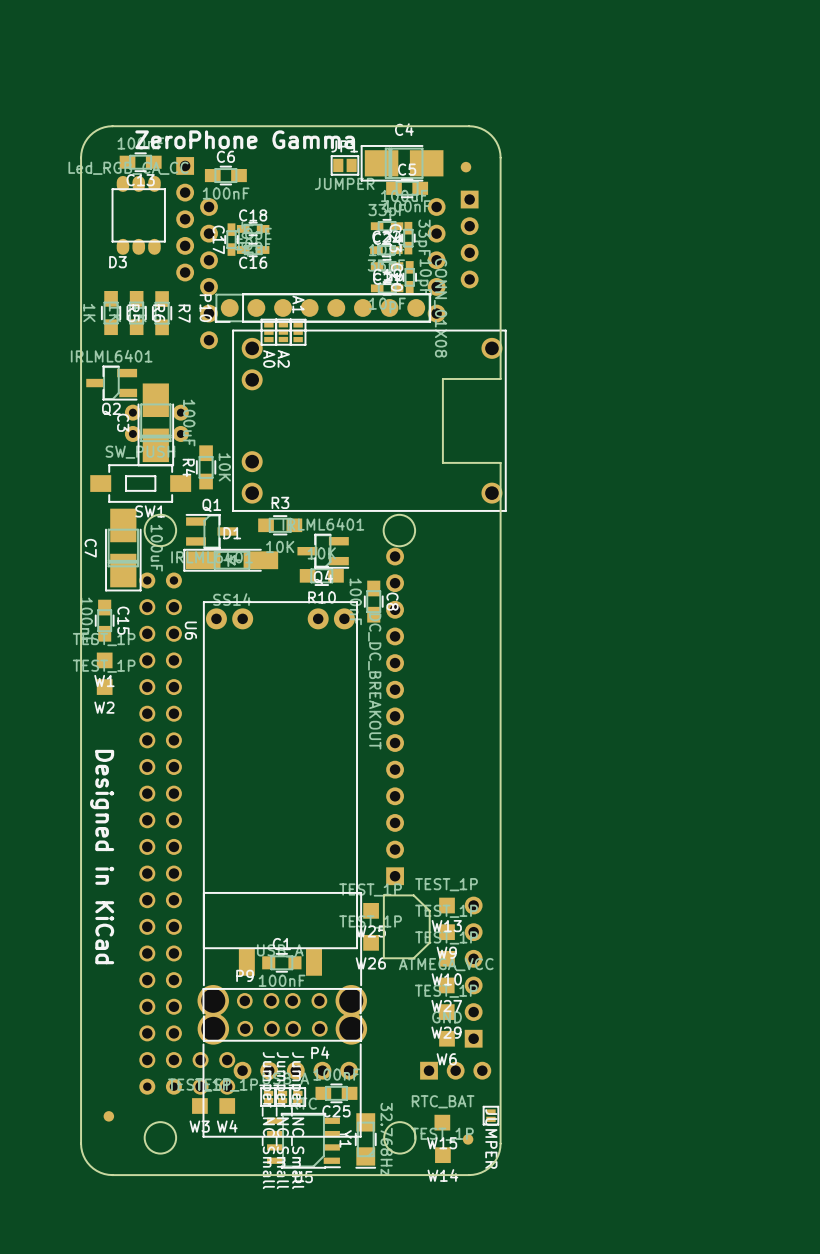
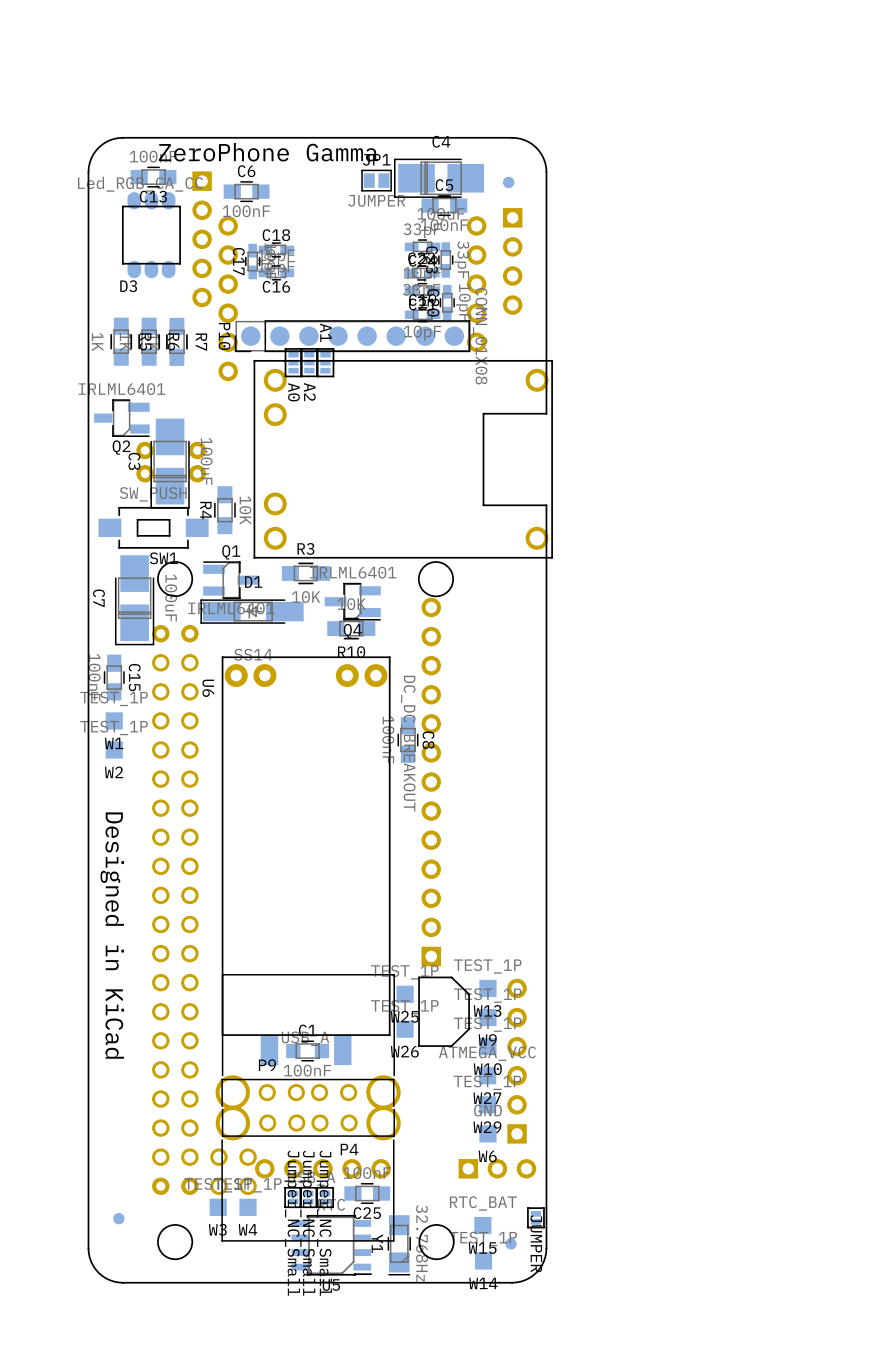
C8 position: (373, 601) -> (407, 740)

